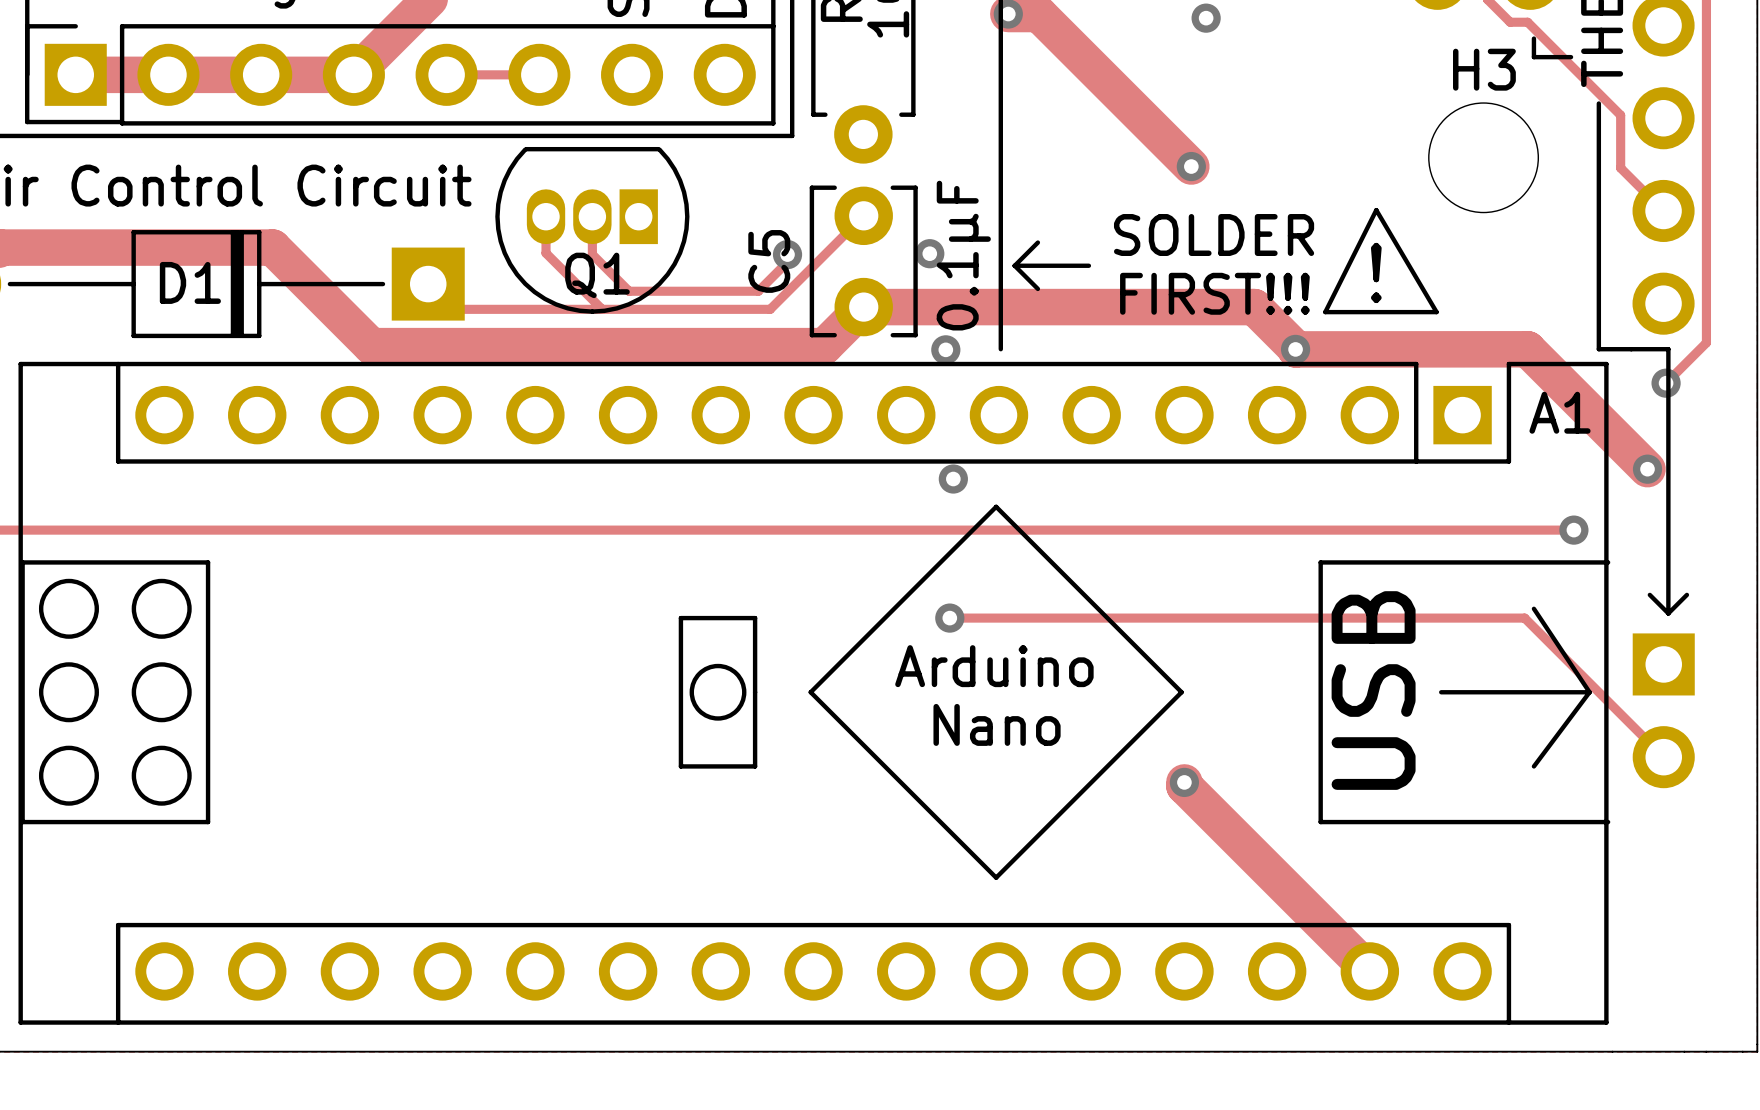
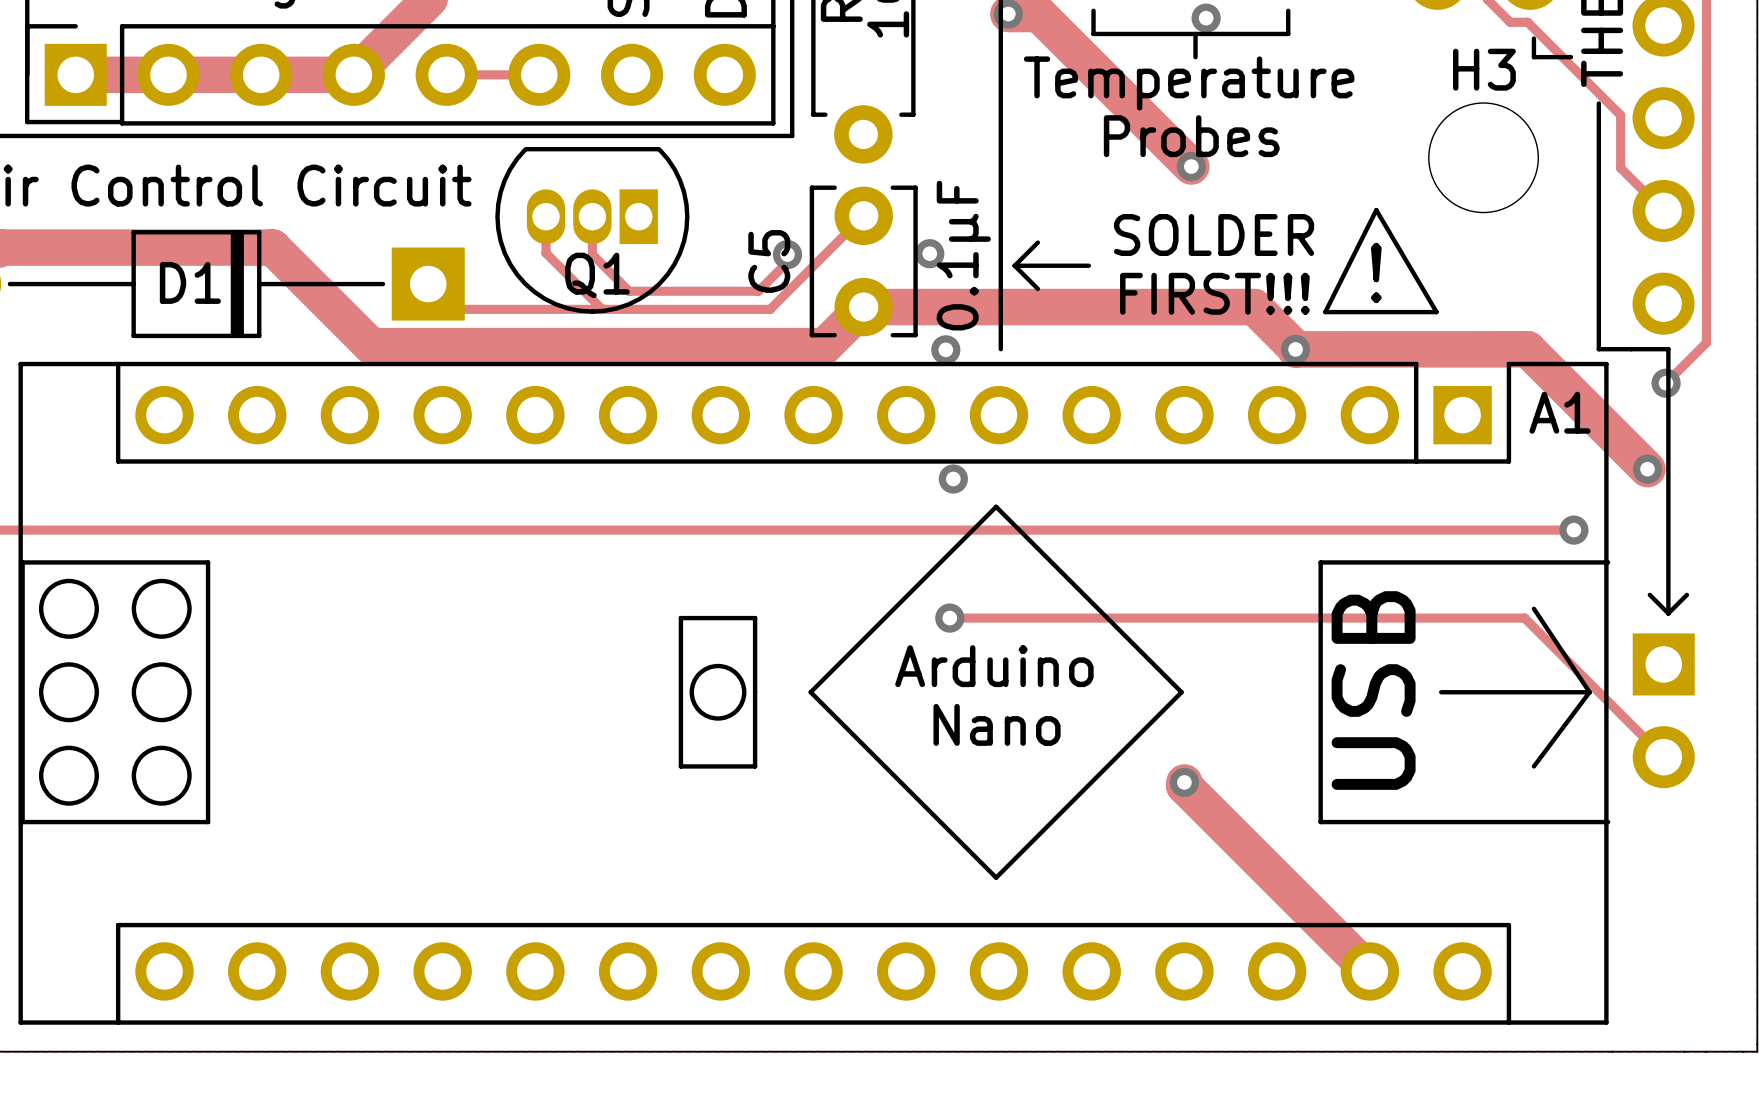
line: none -> (1093, 10) (1093, 33) (1288, 33) (1288, 10)
line: none -> (1195, 33) (1195, 57)
text: none -> Temperature (1189, 83)
text: none -> Probes (1191, 136)

